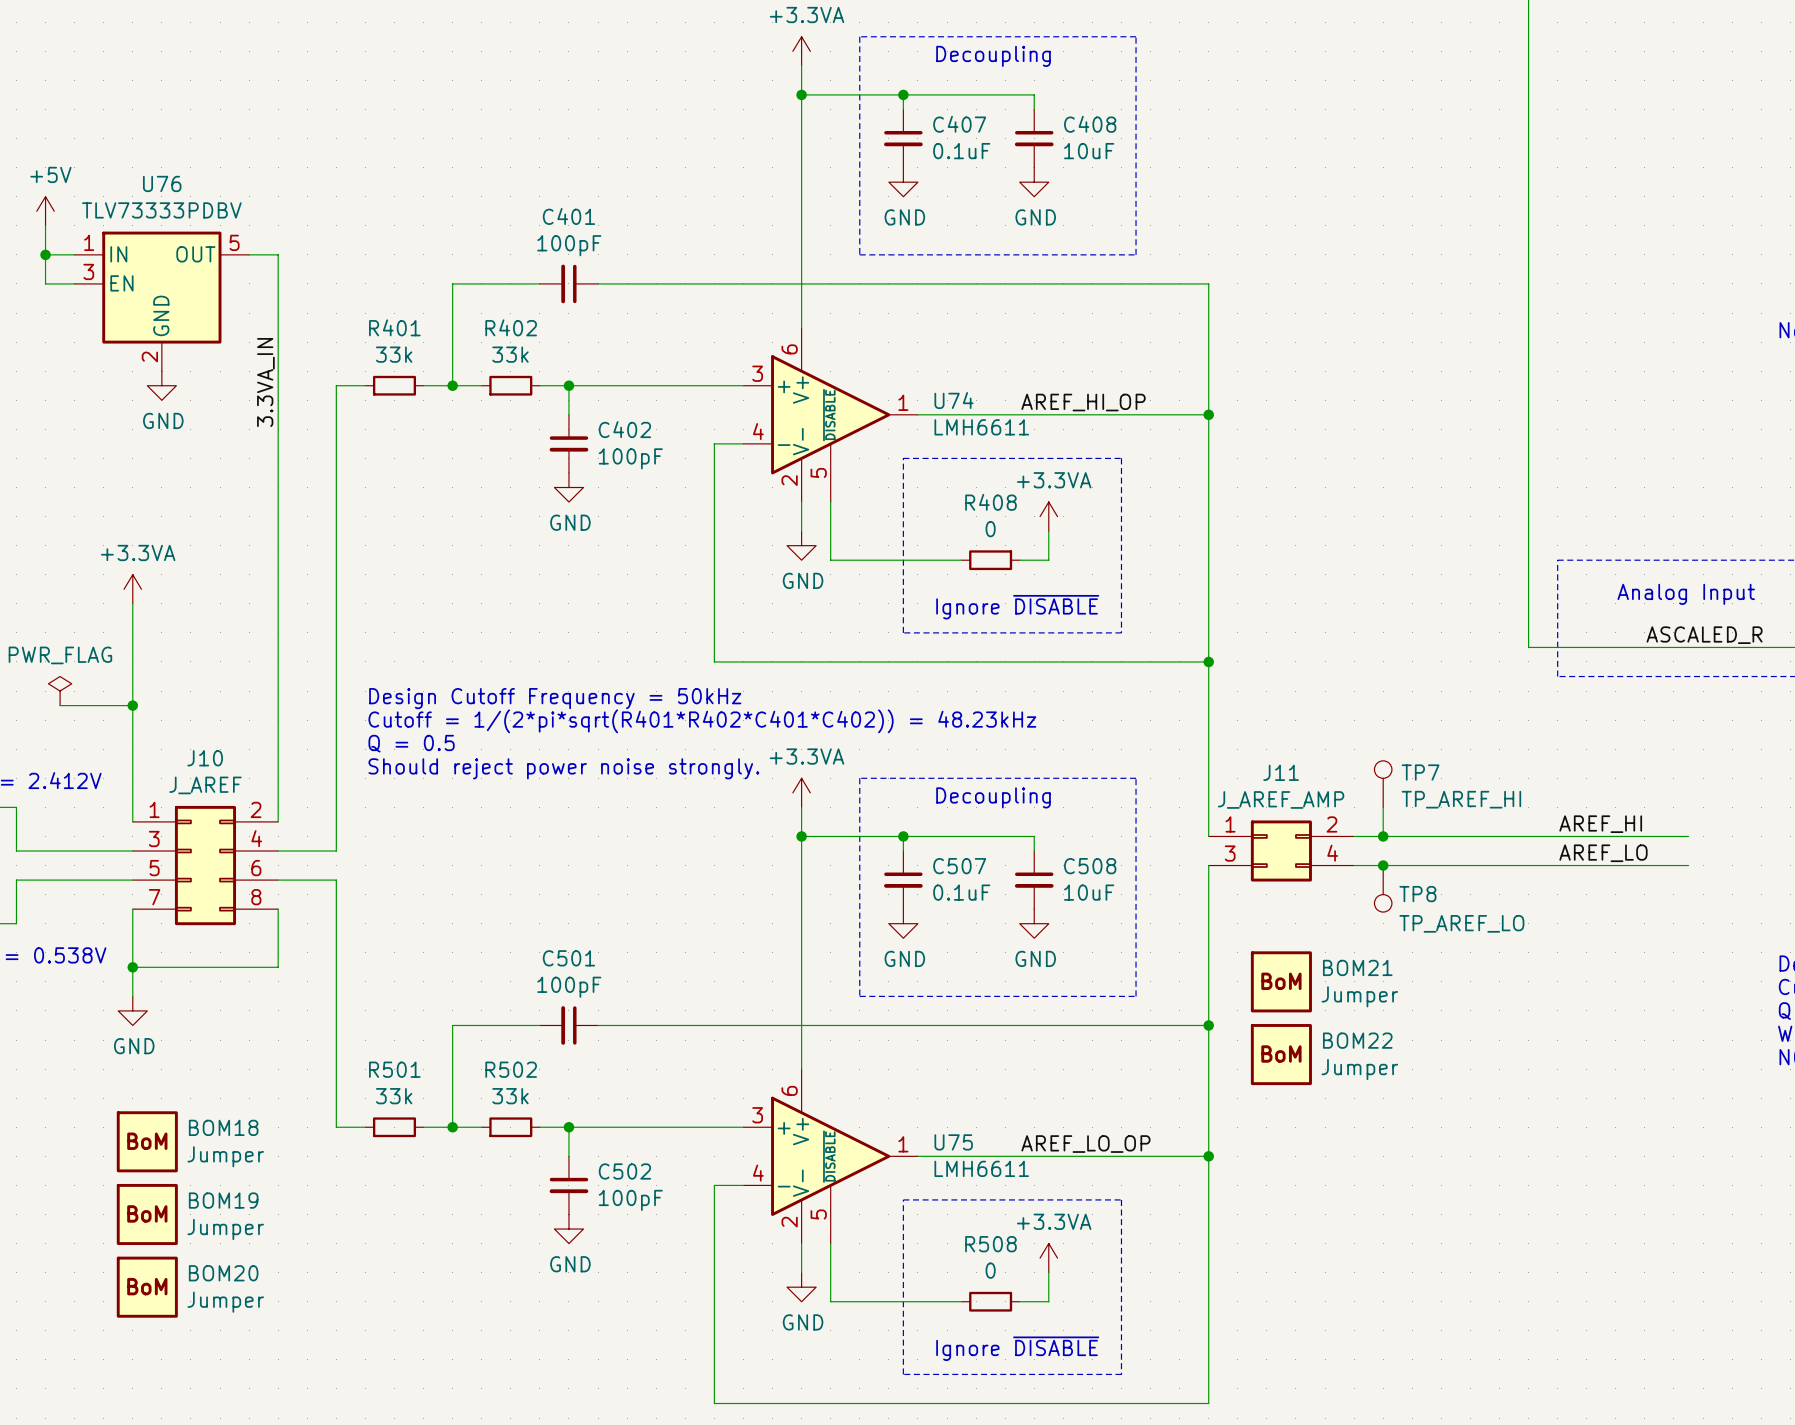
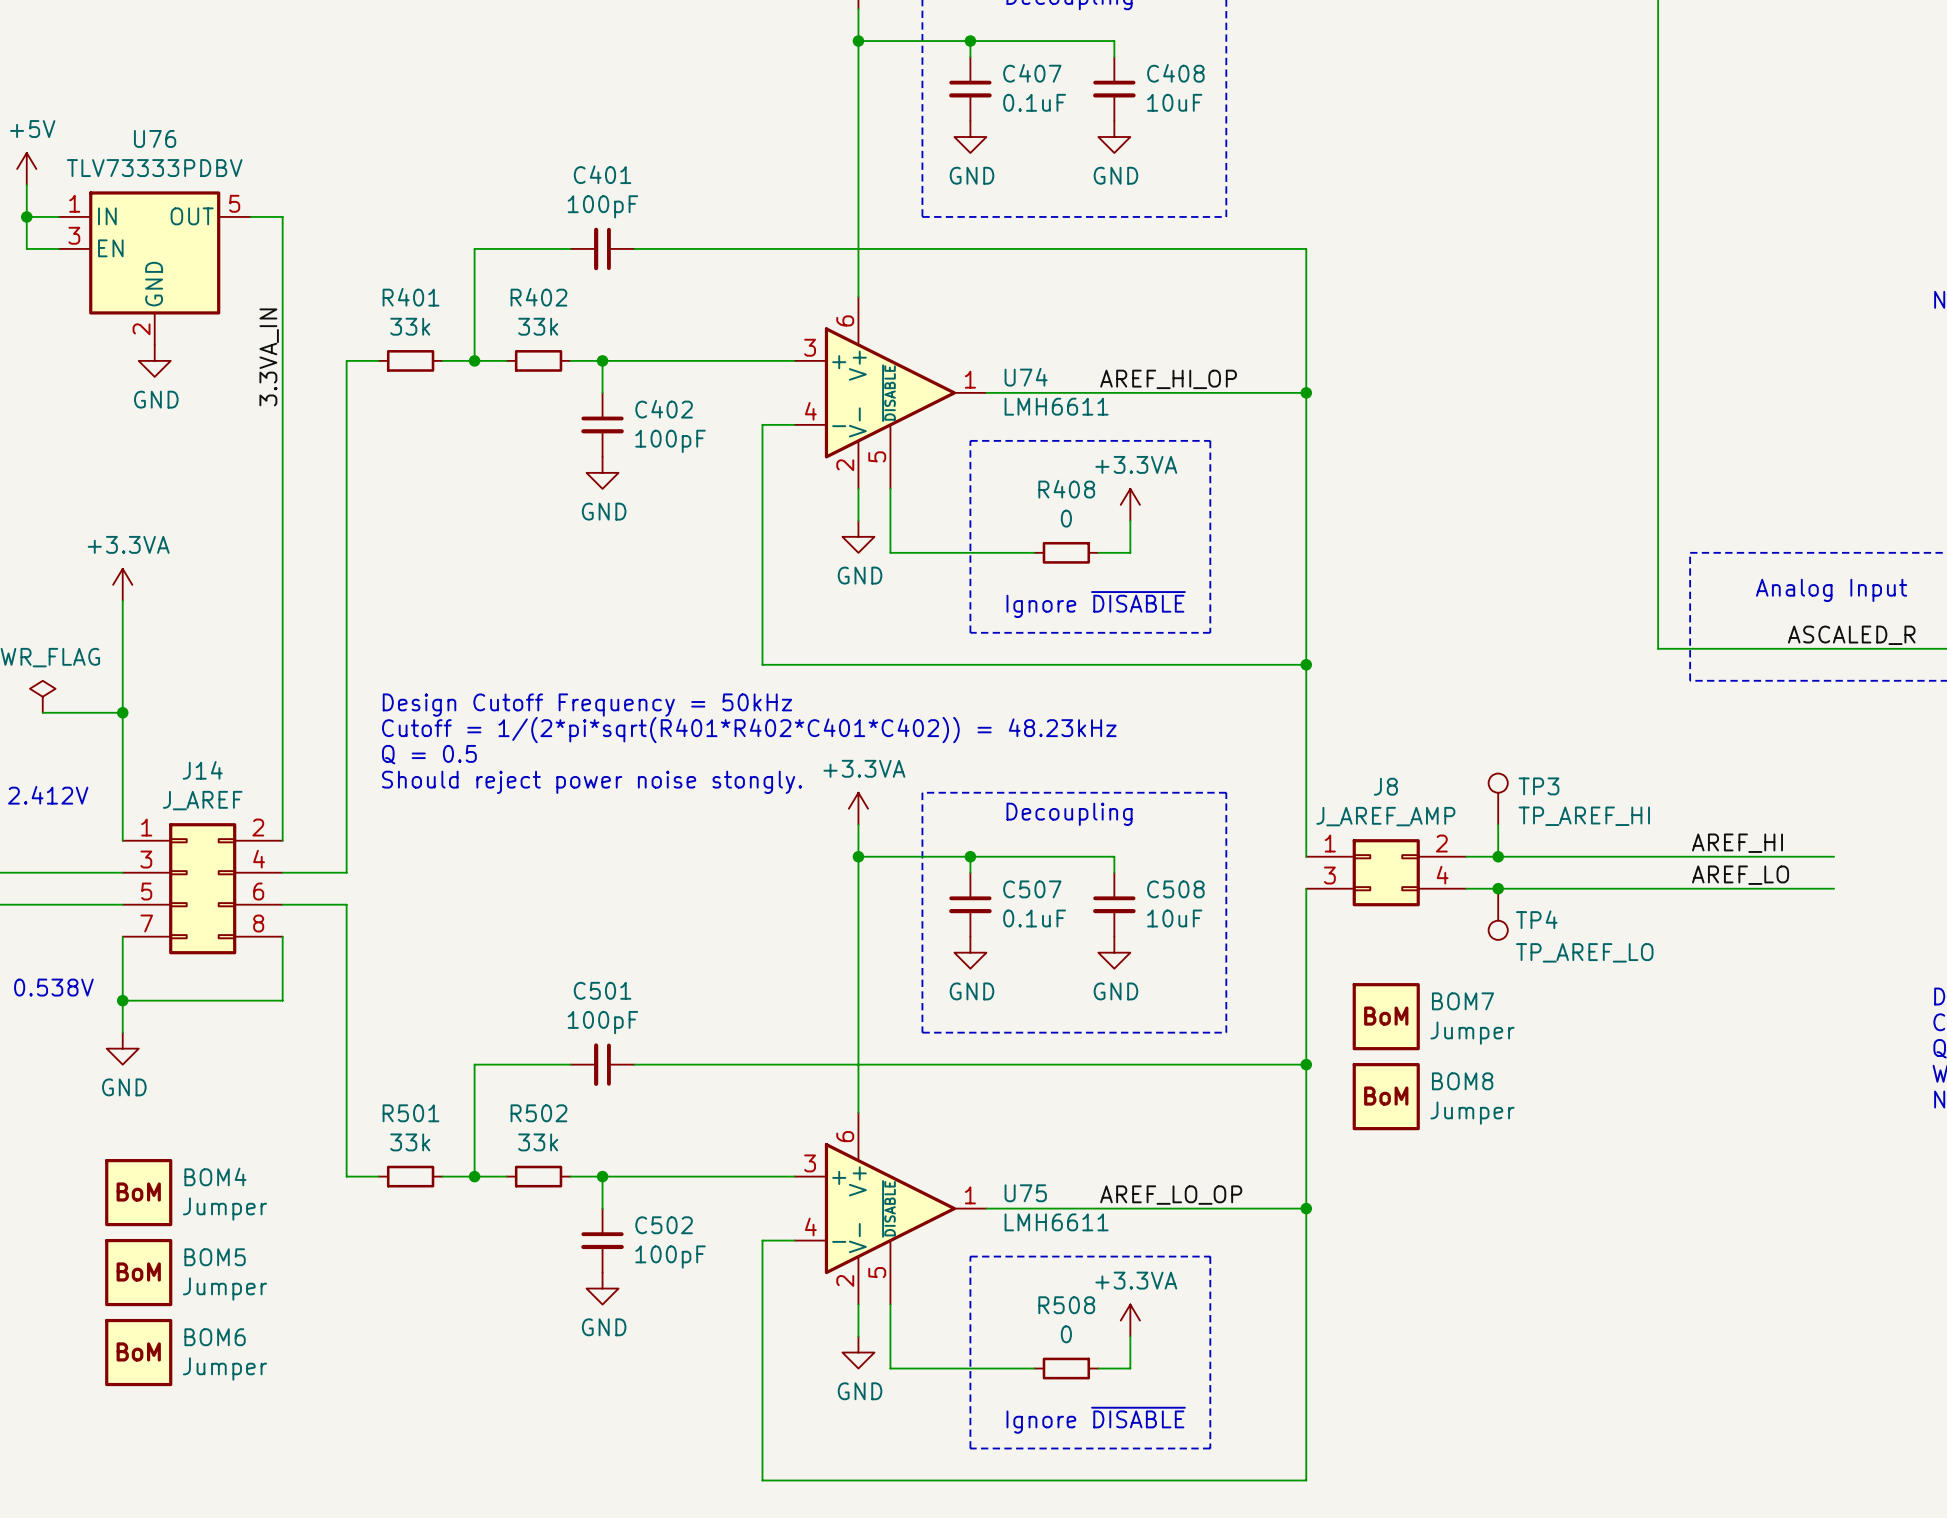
J10 name: J10 (205, 758) -> J14 (202, 770)
text: Should reject power noise strongly. (563, 768) -> Should reject power noise stongly. (592, 782)
J11 name: J11 (1281, 772) -> J8 (1385, 786)
TP7 name: TP7 (1420, 772) -> TP3 (1538, 786)
TP8 name: TP8 (1417, 894) -> TP4 (1536, 919)
BOM21 name: BOM21 (1357, 967) -> BOM7 (1462, 1001)
BOM22 name: BOM22 (1357, 1040) -> BOM8 (1462, 1081)
BOM18 name: BOM18 (223, 1127) -> BOM4 (215, 1176)
BOM19 name: BOM19 (223, 1200) -> BOM5 (215, 1257)
BOM20 name: BOM20 (223, 1273) -> BOM6 (215, 1337)

